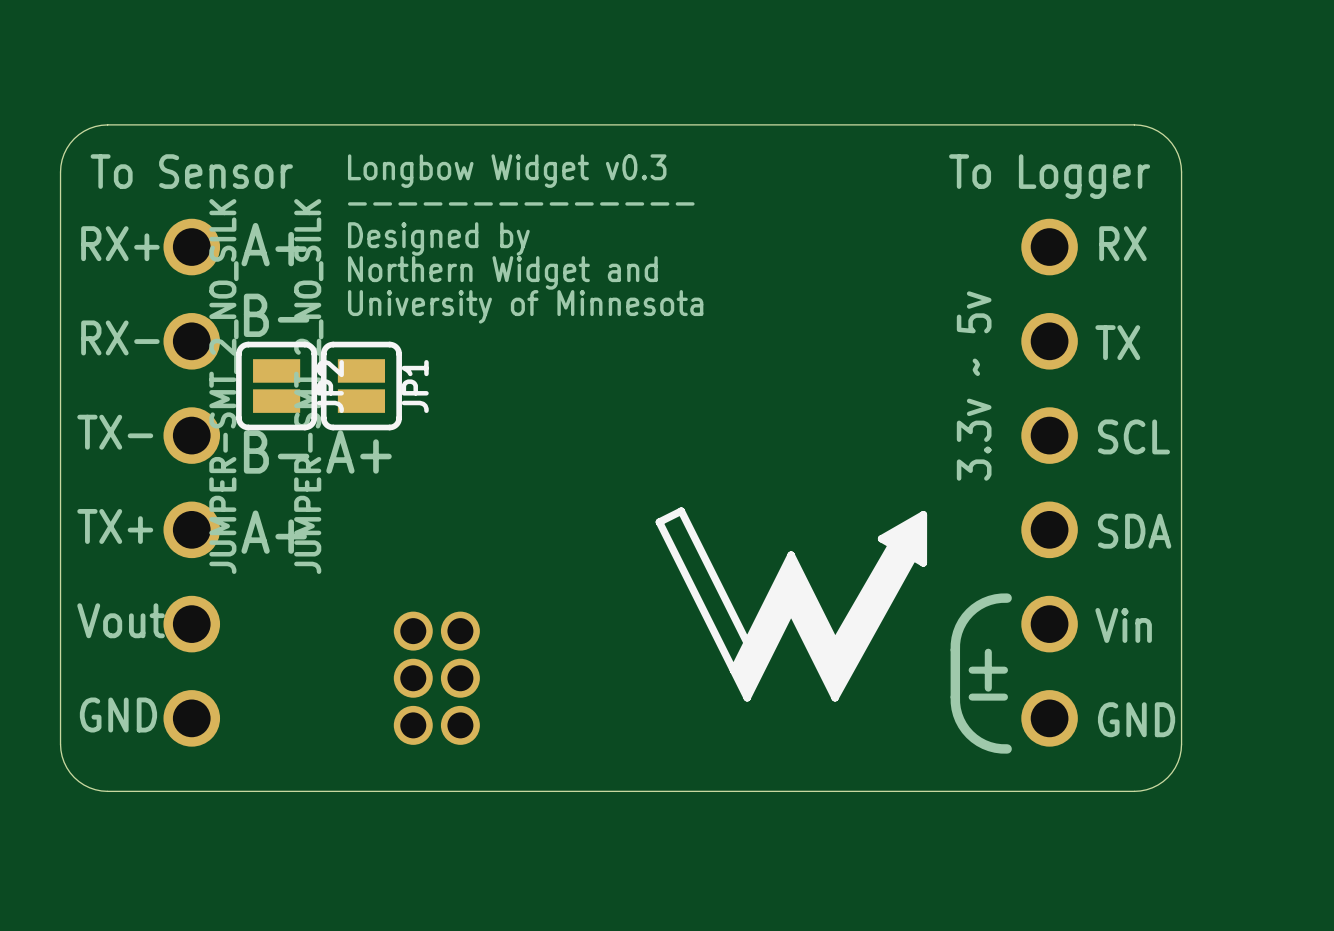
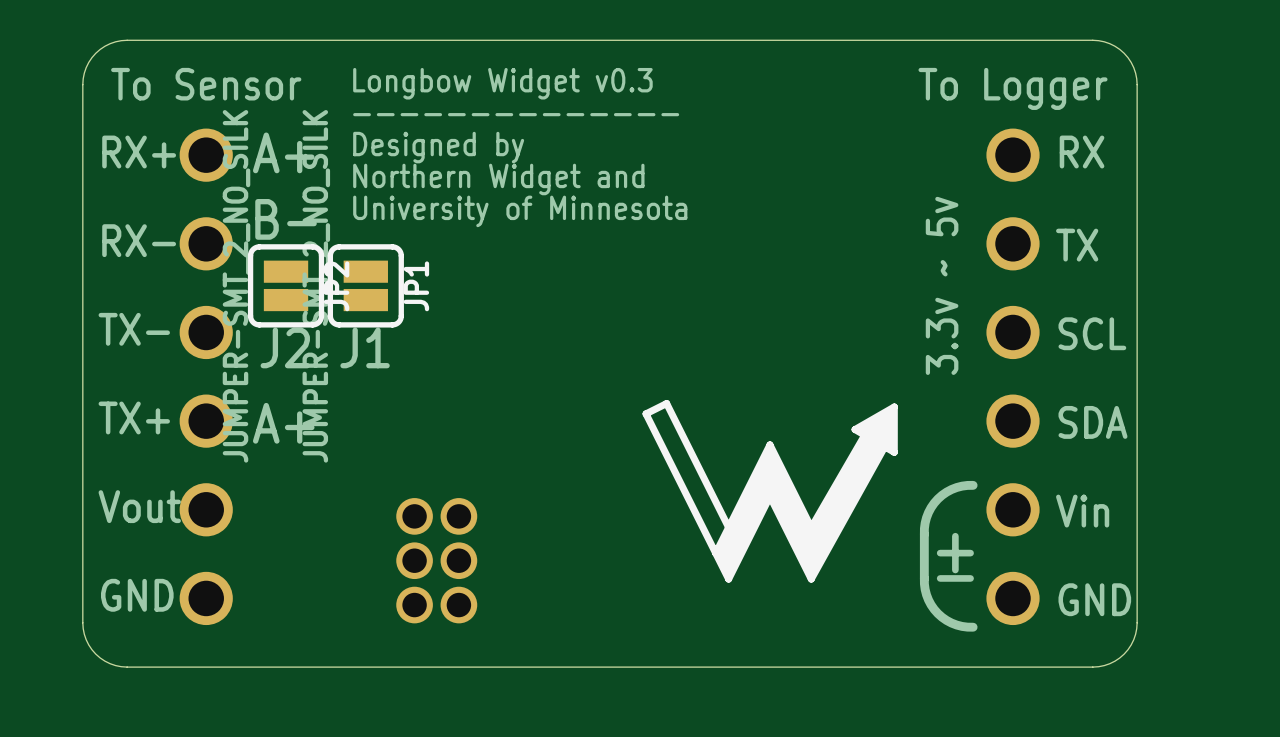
text: B- (276, 452) -> J2 (285, 347)
text: A+ (359, 452) -> J1 (365, 347)

